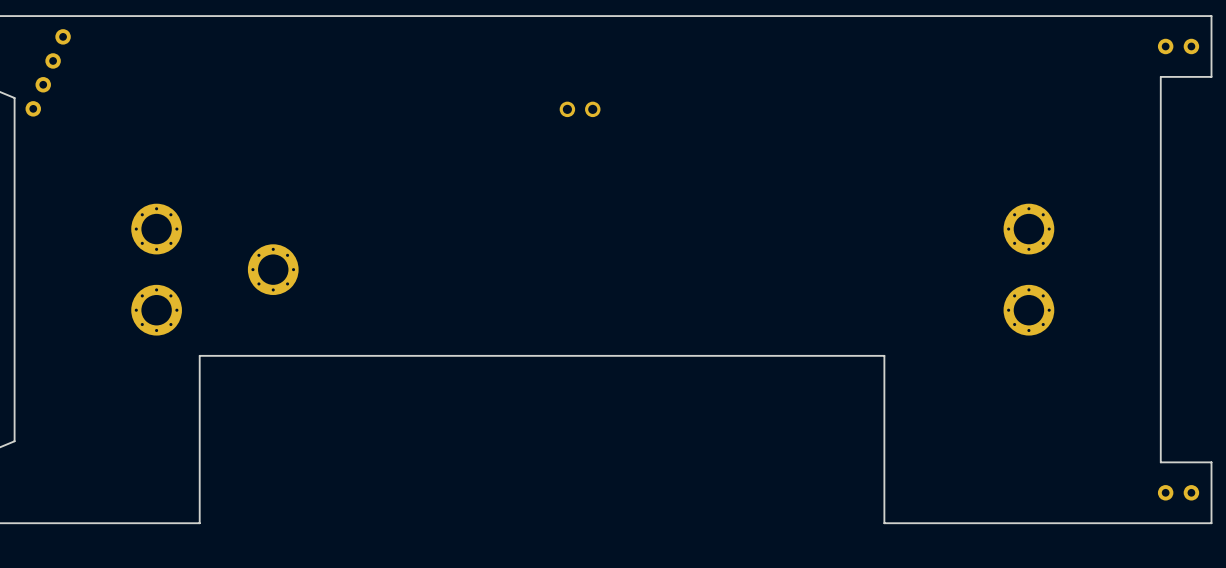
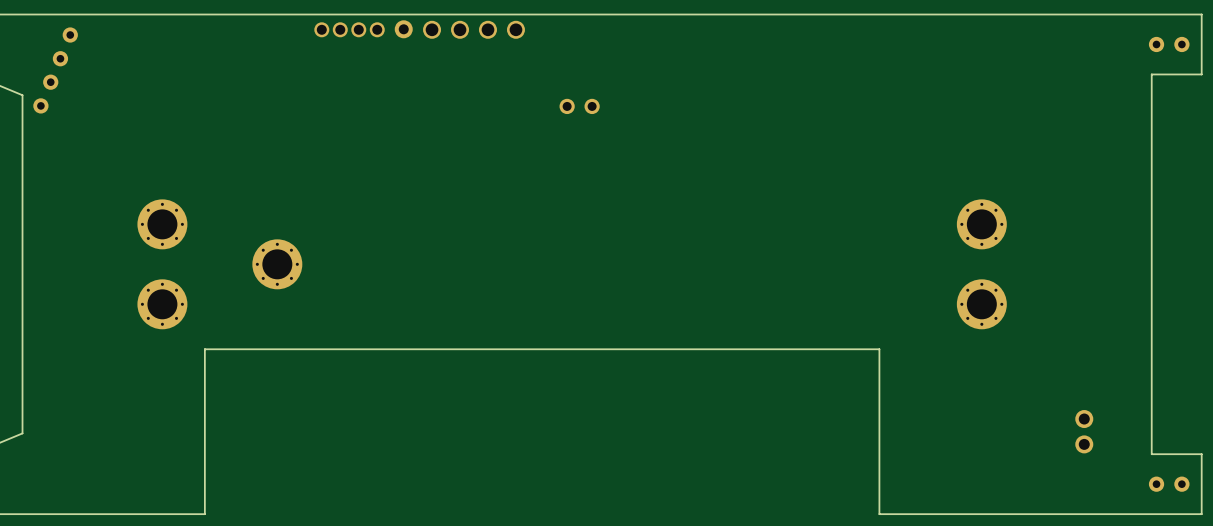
part: none -> (419, 29)
part position: (1028, 229) -> (981, 224)
part position: (1028, 310) -> (981, 304)
part: none -> (1084, 431)

